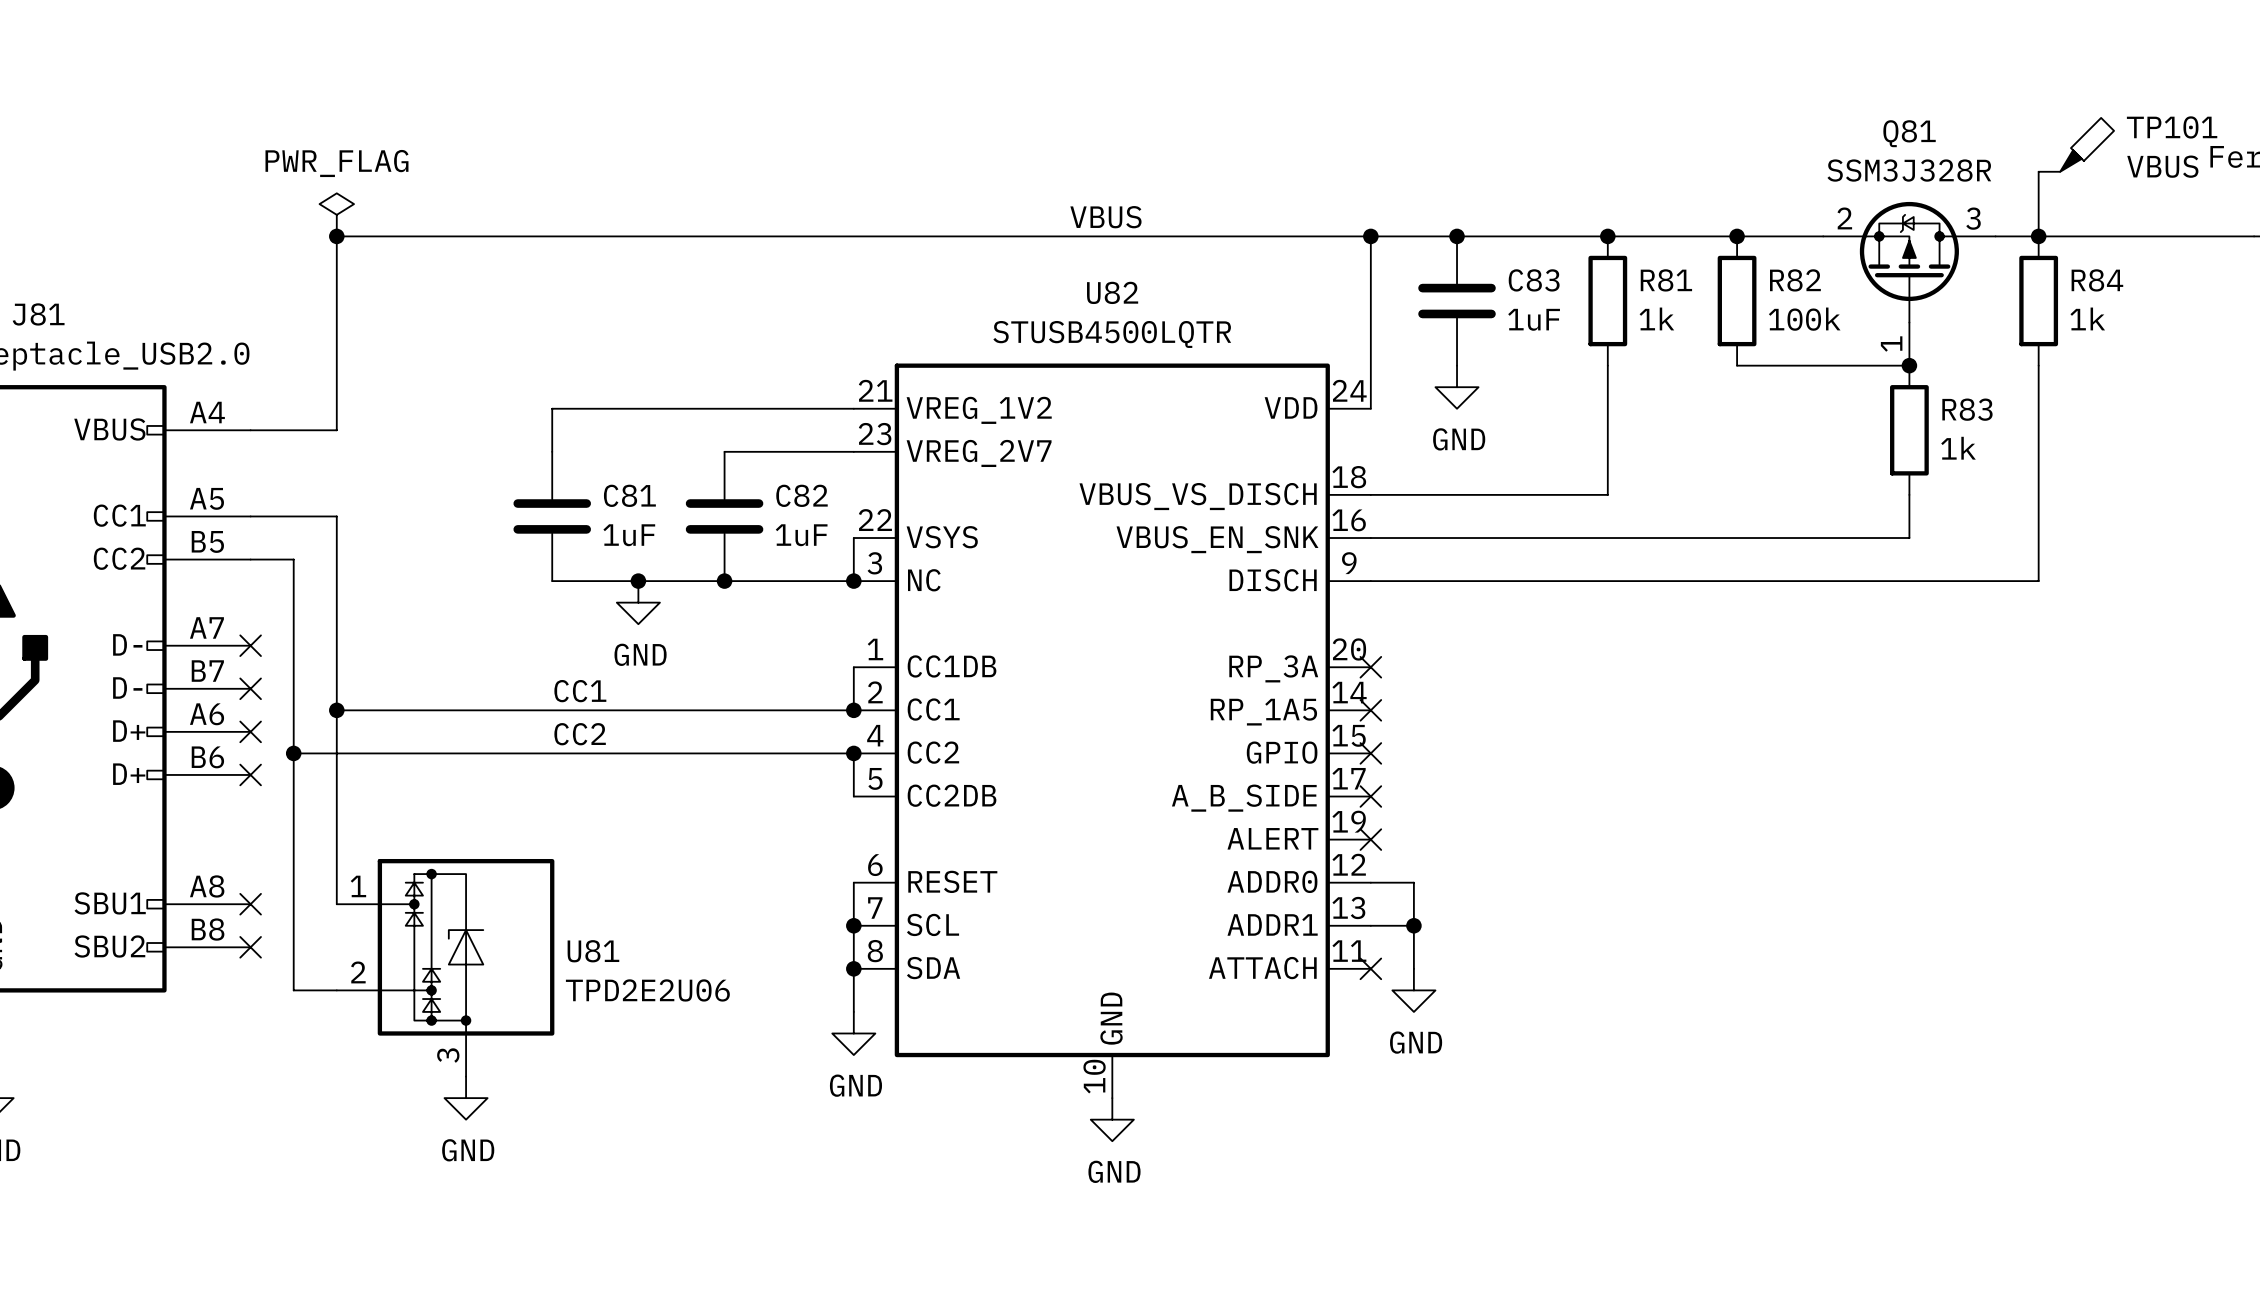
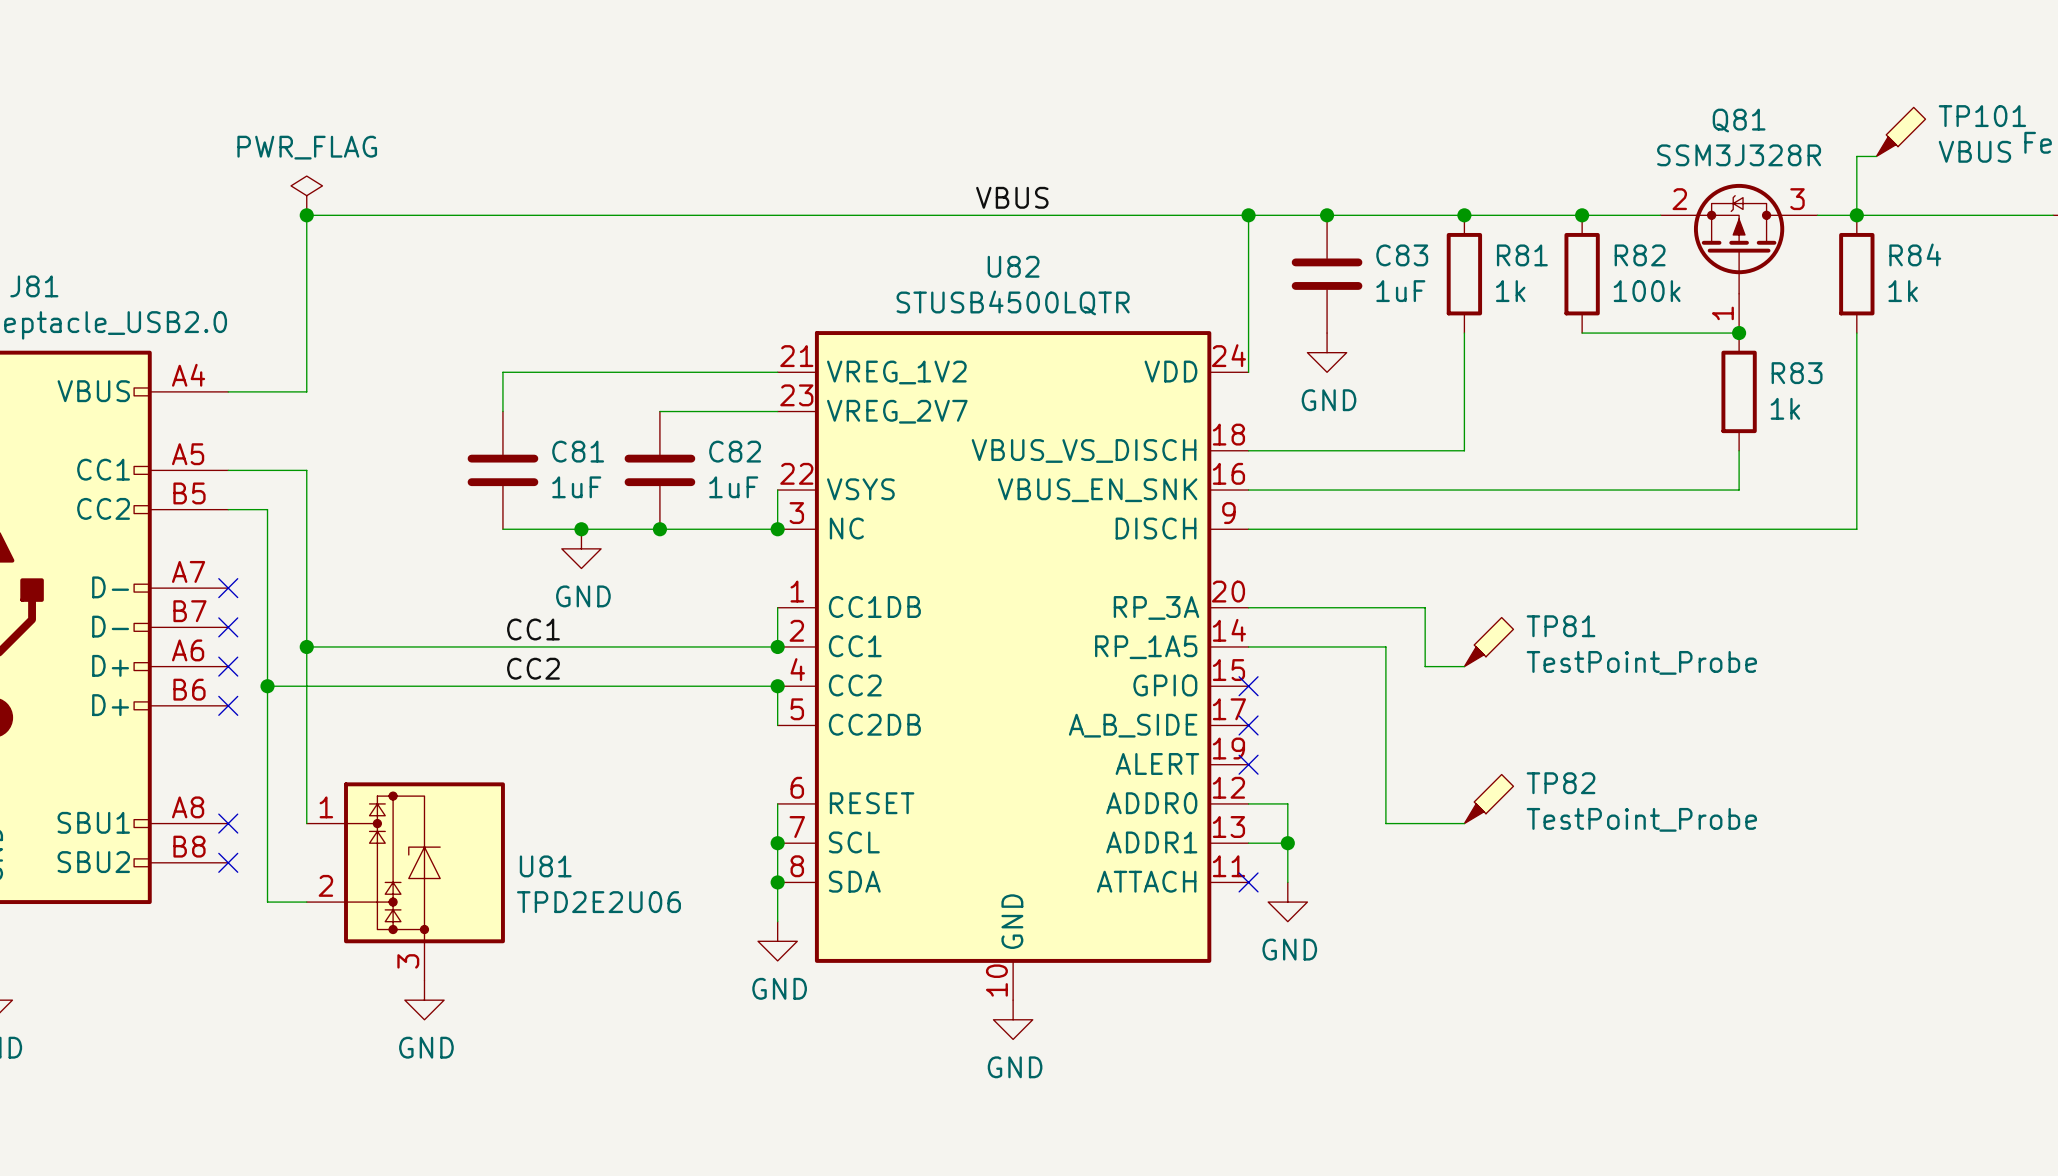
wire: none -> (1248, 607) (1425, 607) (1425, 666) (1464, 666)
no-connect mark: (1370, 667) -> none
TP81: none -> TestPoint_Probe (1488, 642)
wire: none -> (1248, 646) (1385, 646) (1385, 823) (1464, 823)
no-connect mark: (1370, 710) -> none
TP82: none -> TestPoint_Probe (1488, 799)

